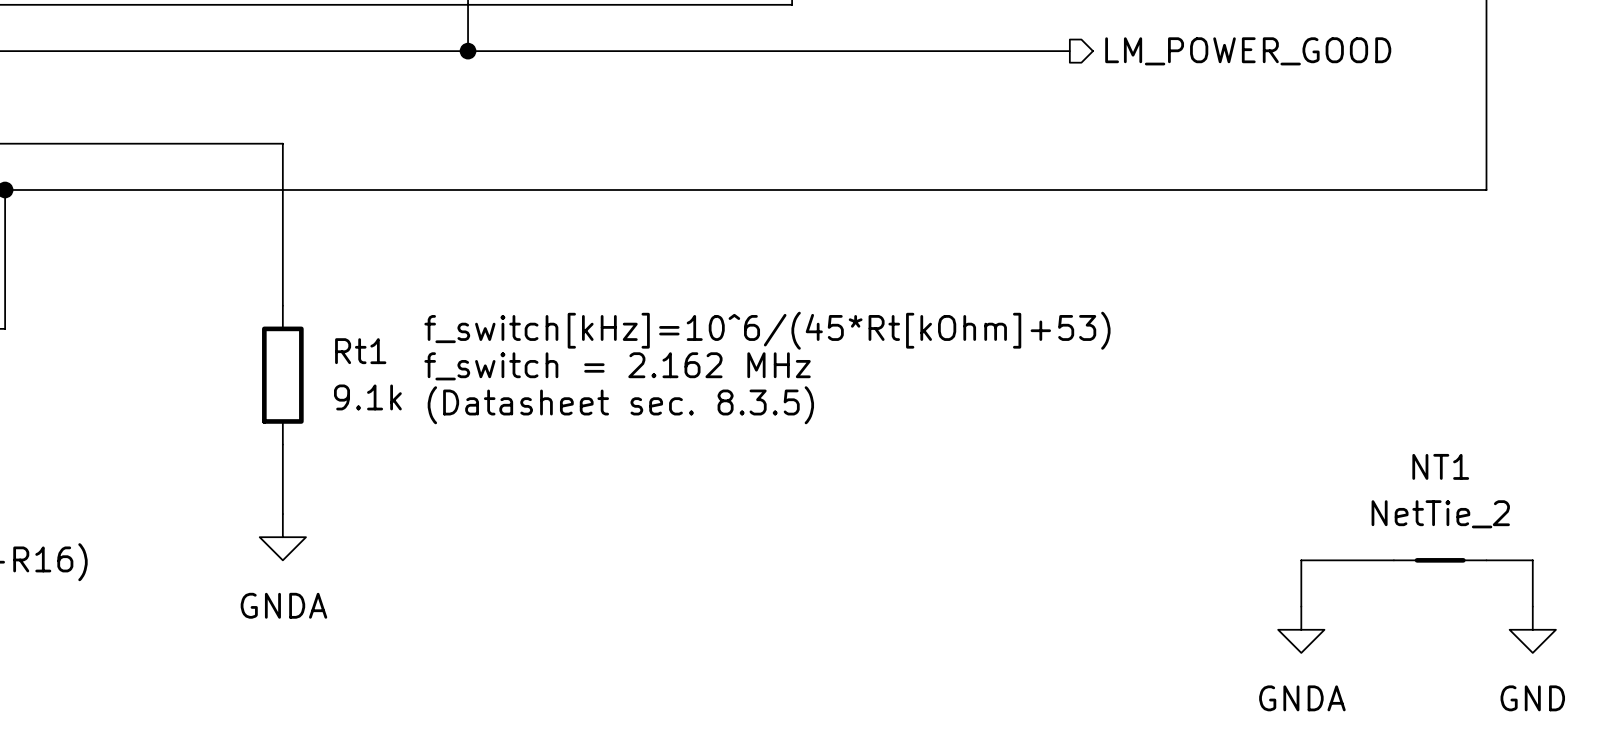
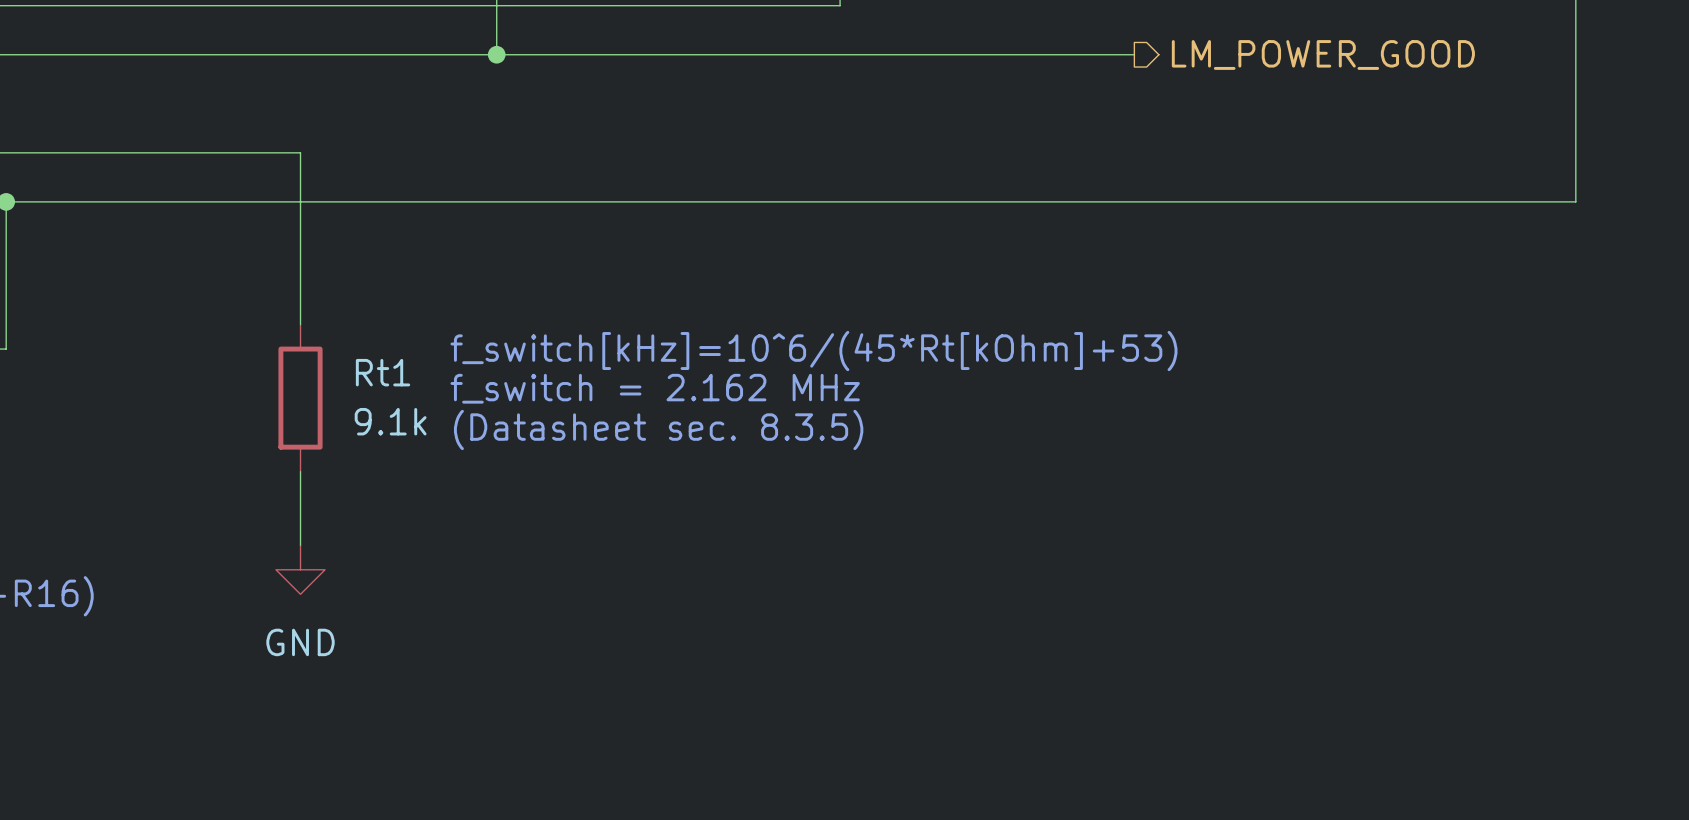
power symbol: GNDA (282, 537) -> GND (300, 569)
wire: (1393, 560) (1301, 560) (1301, 606) -> none
NT1: NetTie_2 (1440, 560) -> none
wire: (1486, 560) (1532, 560) (1532, 606) -> none
power symbol: GNDA (1301, 629) -> none
power symbol: GND (1532, 629) -> none

